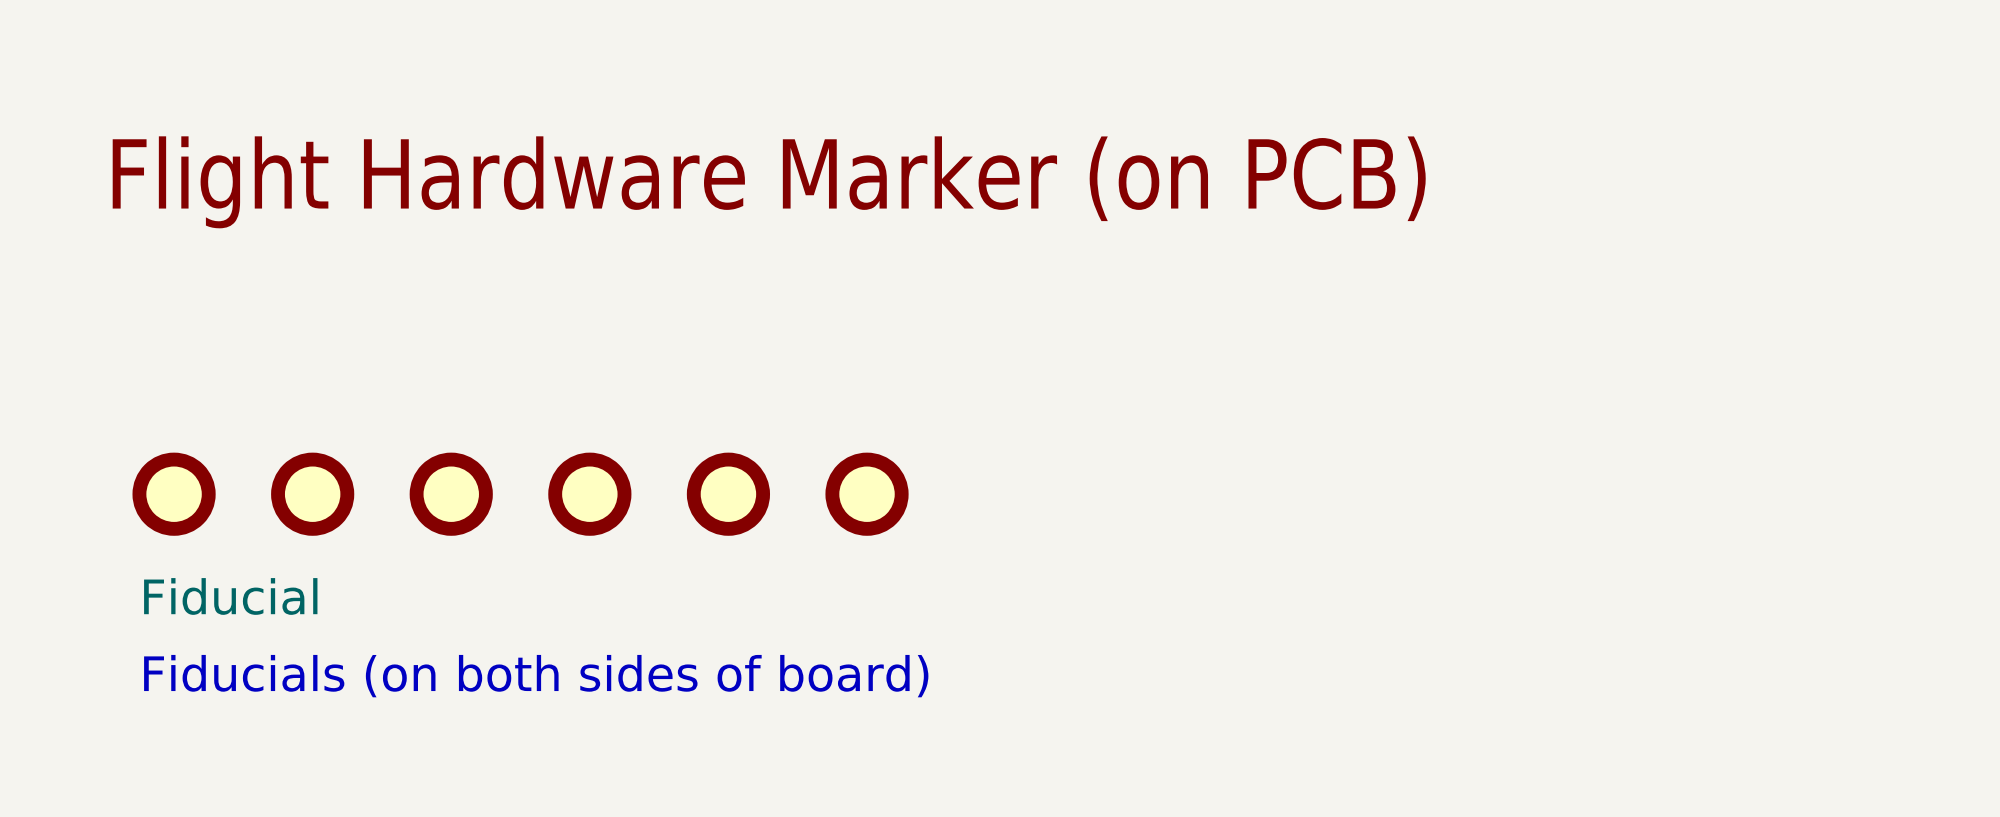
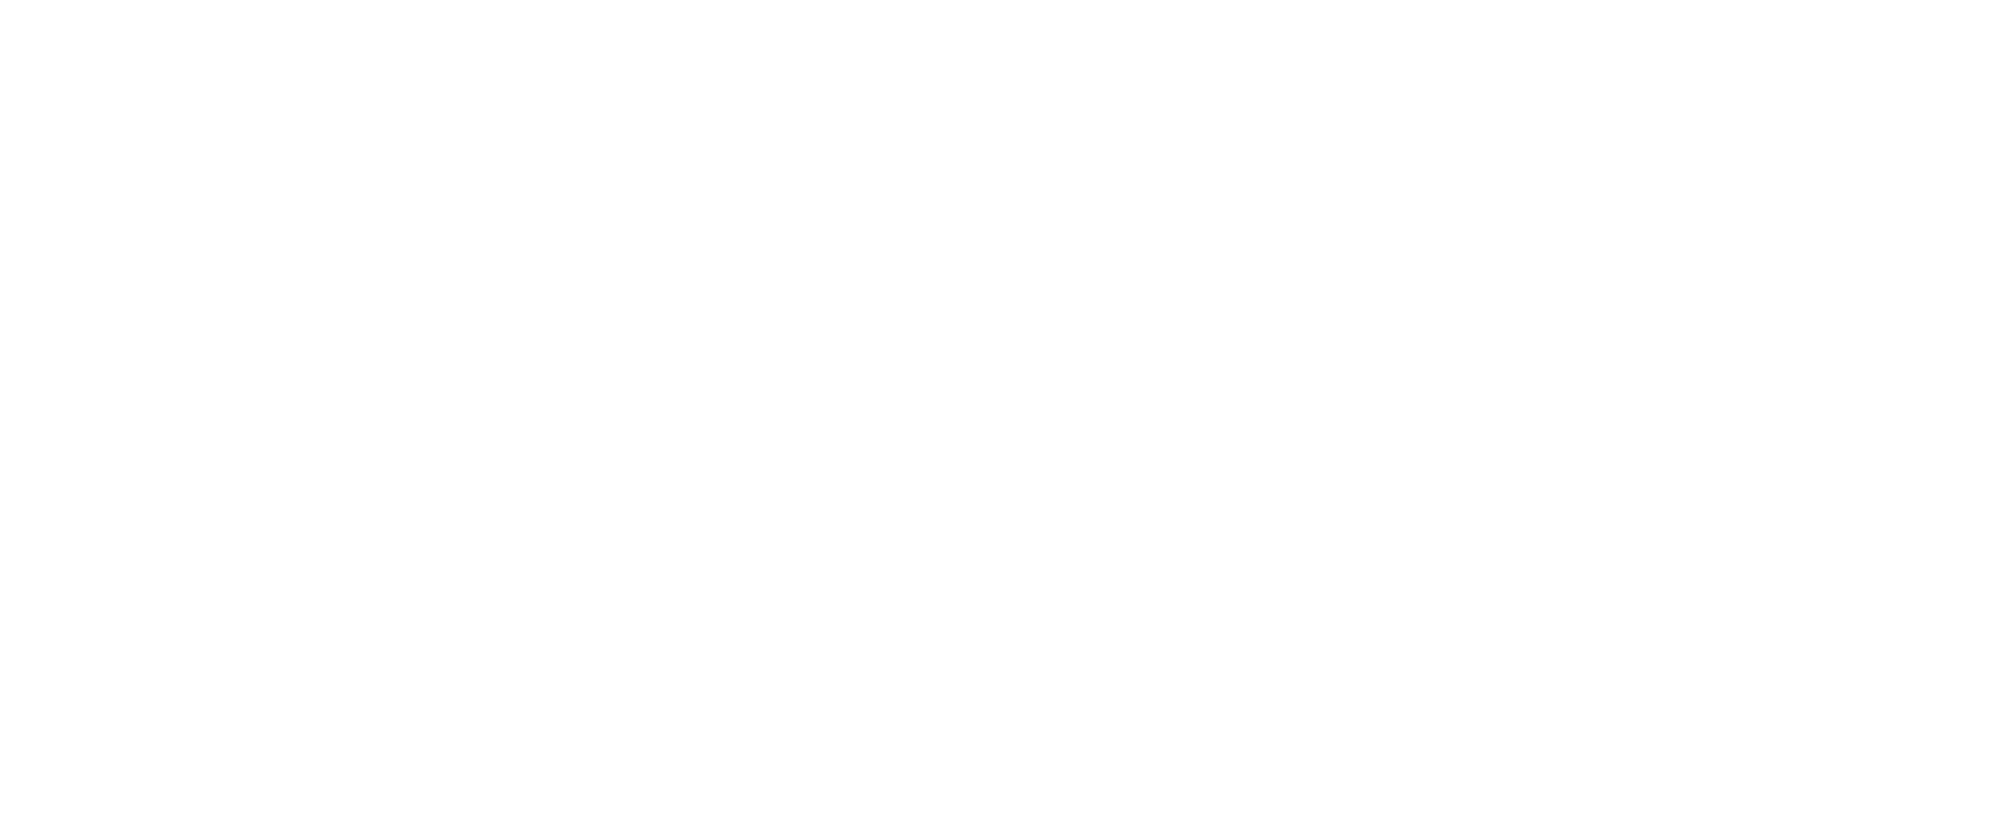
part: (769, 182) -> none
part: Fiducial (174, 494) -> none
part: (312, 494) -> none
part: (451, 494) -> none
part: (589, 494) -> none
part: (728, 494) -> none
part: (867, 494) -> none
text: Fiducials (on both sides of board) (536, 676) -> none

